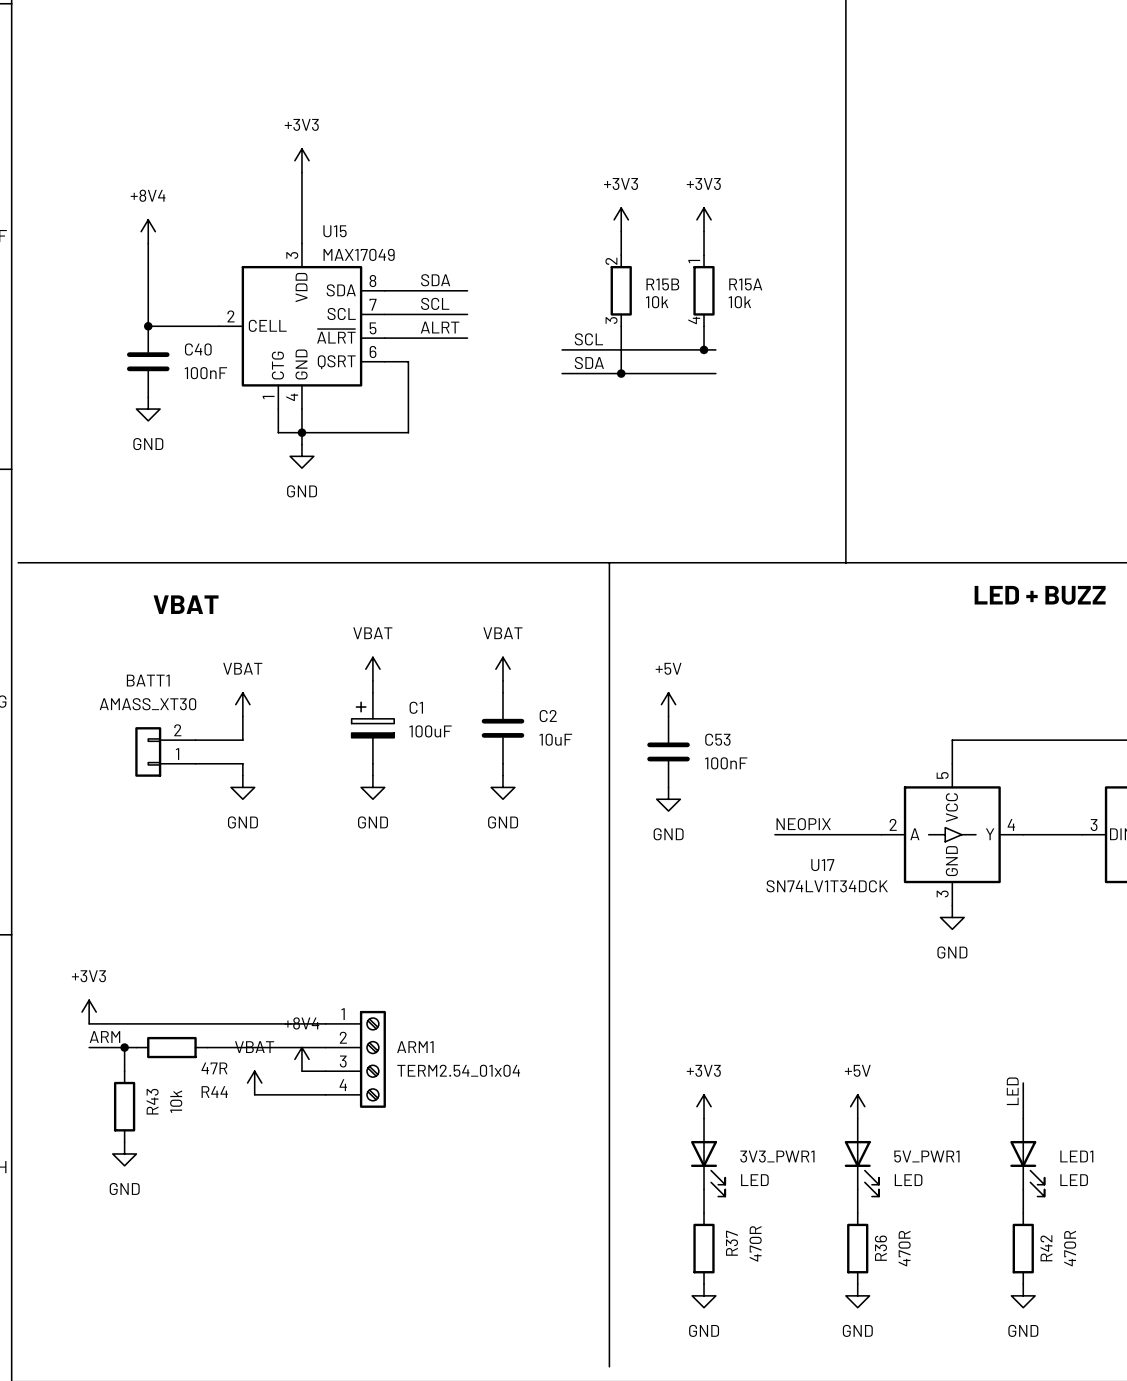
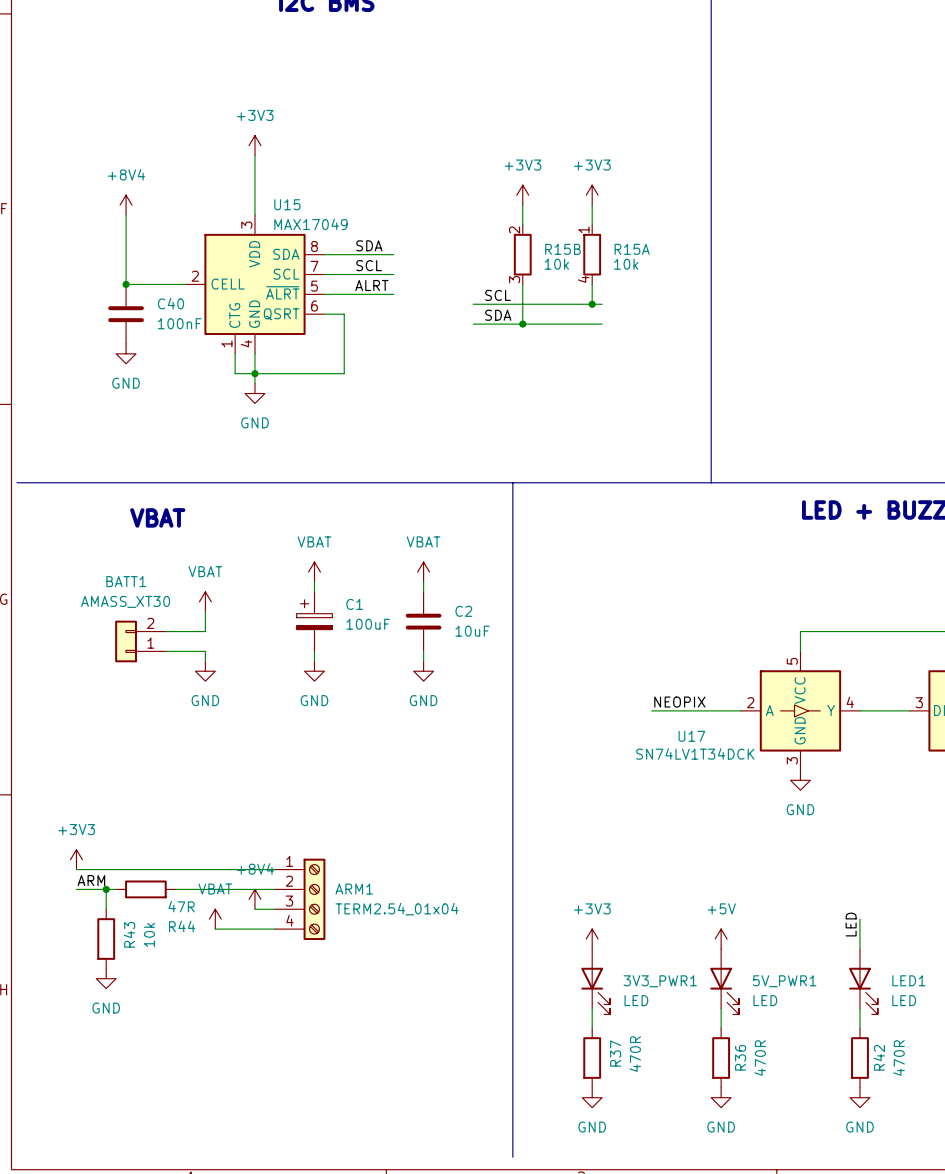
power symbol: +5V (668, 704) -> none
C53: 100nF (668, 751) -> none
power symbol: GND (668, 799) -> none

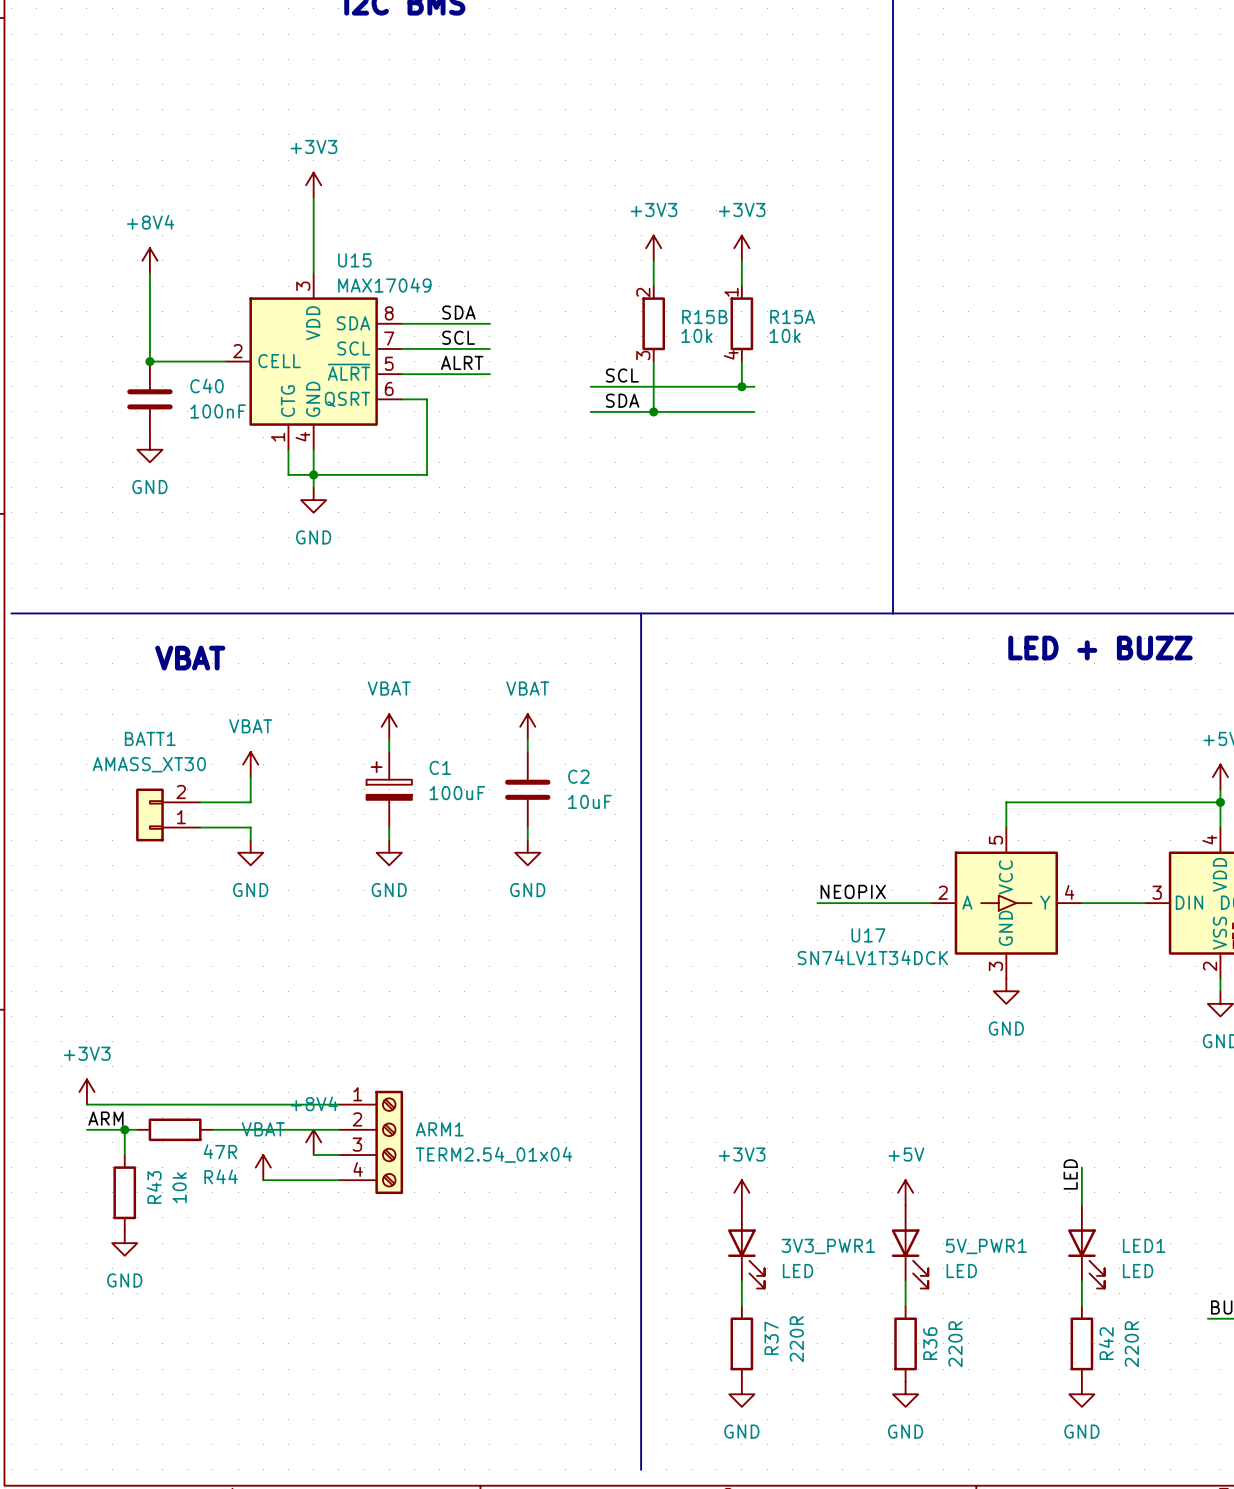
R37 value: 470R (635, 1054) -> 220R (796, 1339)
R36 value: 470R (760, 1058) -> 220R (955, 1344)
R42 value: 470R (899, 1058) -> 220R (1131, 1344)

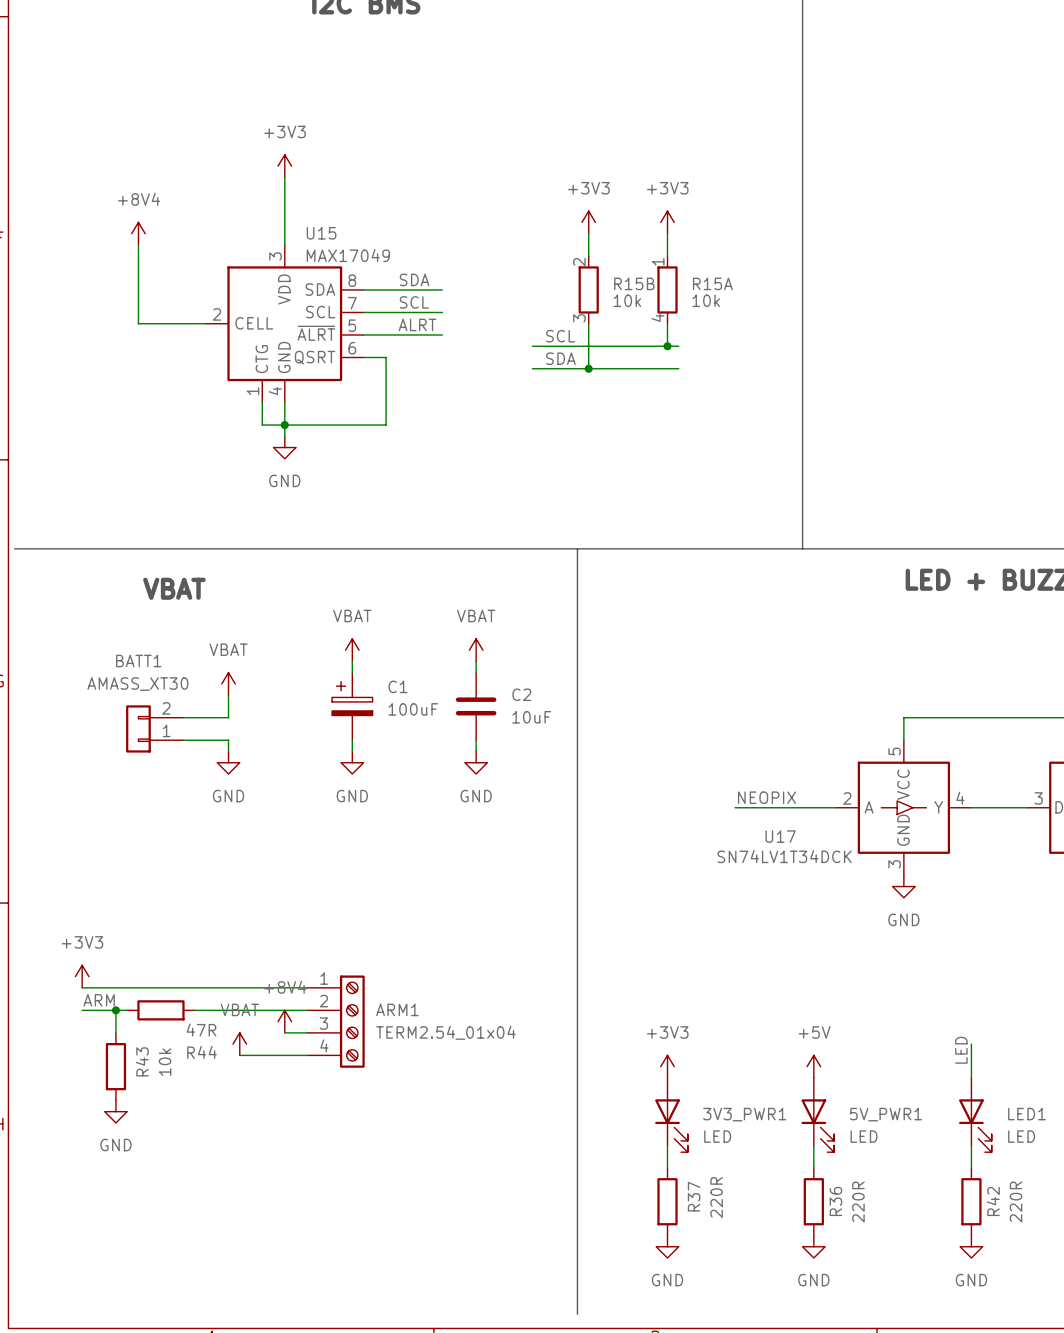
junction: (149, 361) -> none
C40: 100nF (149, 399) -> none
power symbol: GND (149, 449) -> none

